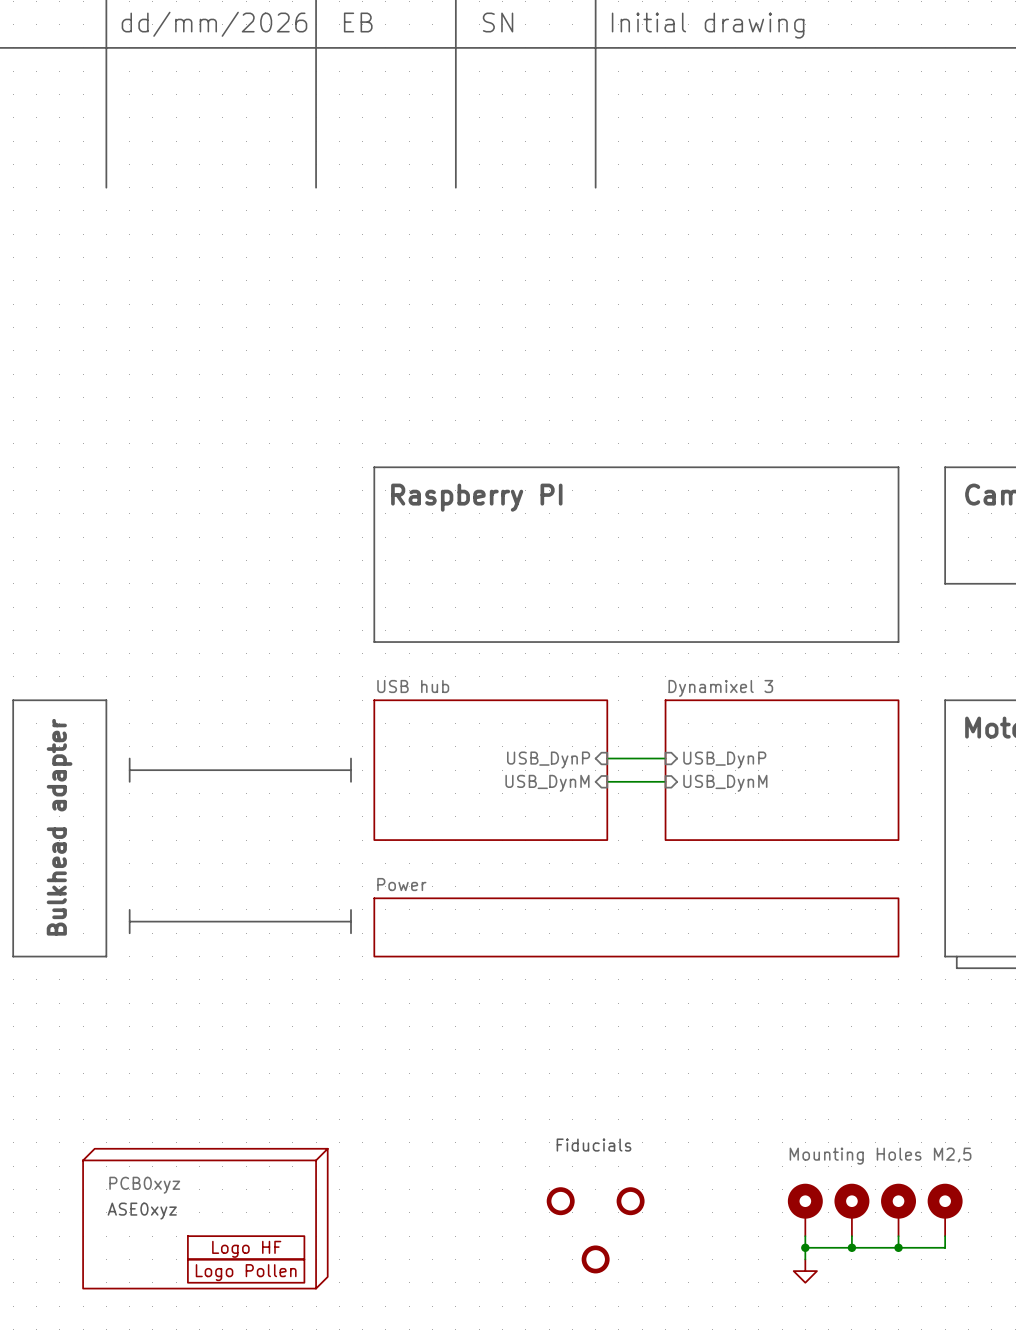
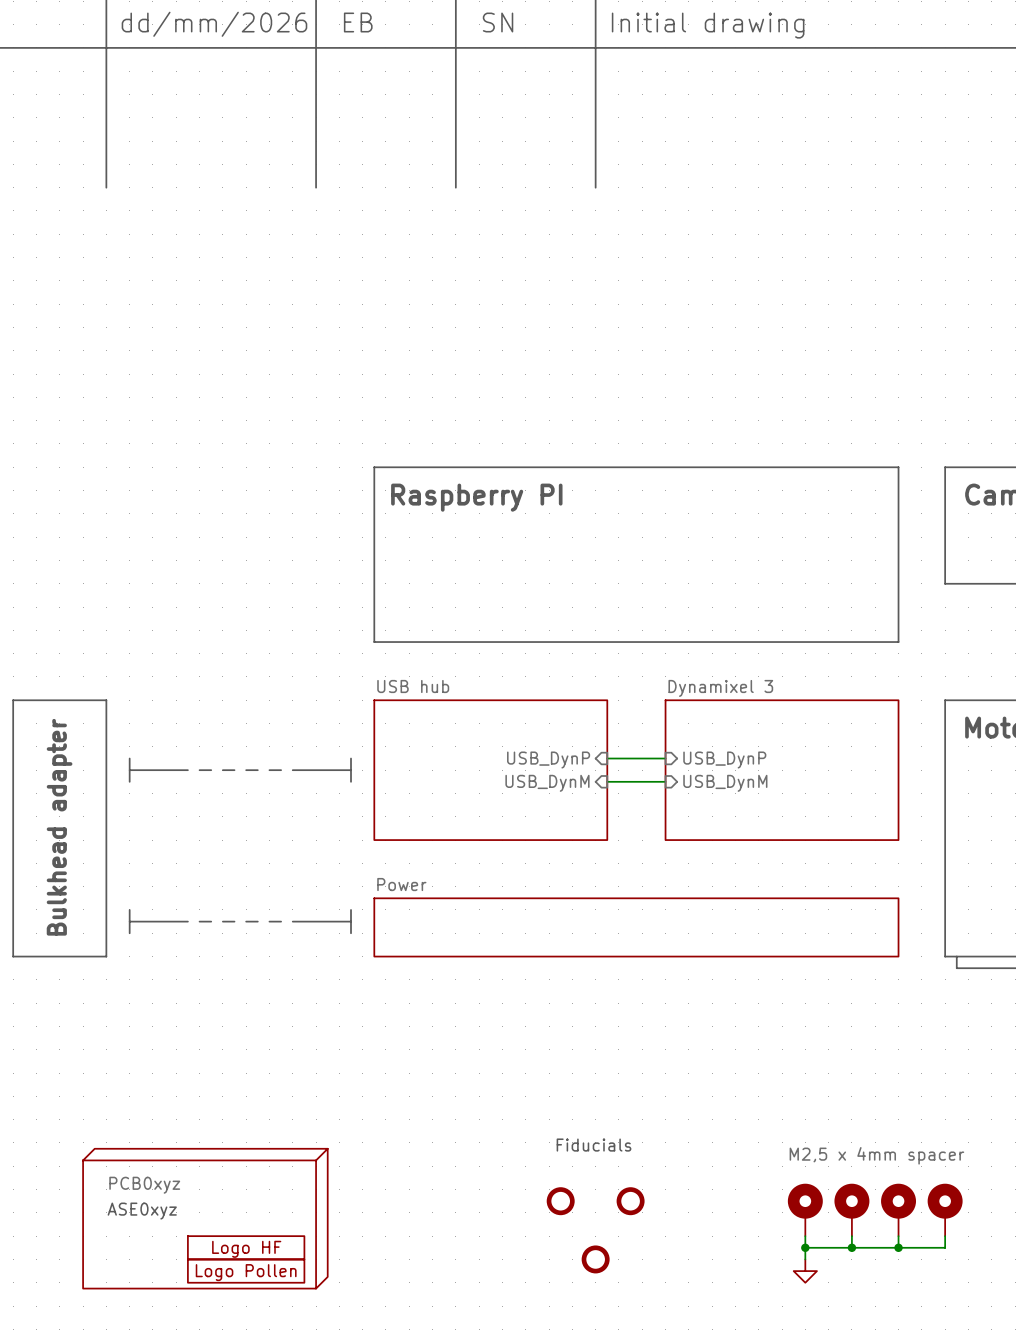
line: (187, 770) (199, 770) -> none
line: (211, 770) (222, 770) -> none
line: (234, 770) (246, 770) -> none
line: (257, 770) (269, 770) -> none
line: (281, 770) (292, 770) -> none
line: (187, 921) (199, 921) -> none
line: (211, 921) (222, 921) -> none
line: (234, 921) (246, 921) -> none
line: (257, 921) (269, 921) -> none
line: (281, 921) (292, 921) -> none
part value: Mounting Holes M2,5 (880, 1156) -> M2,5 x 4mm spacer (876, 1155)

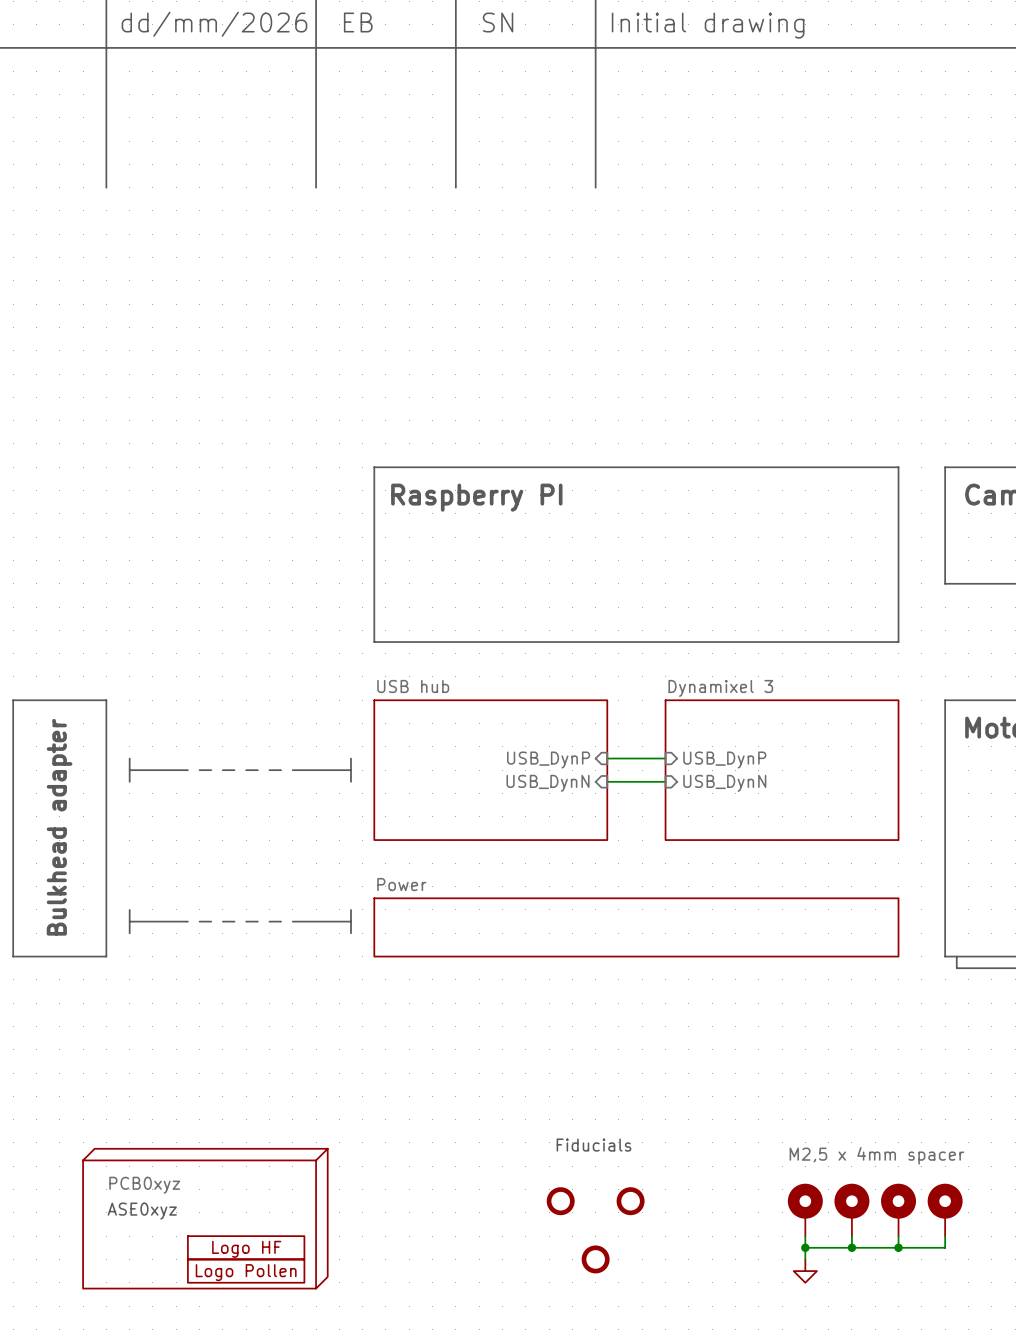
sheet pin: USB_DynM (547, 783) -> USB_DynN (548, 783)
sheet pin: USB_DynM (725, 783) -> USB_DynN (724, 783)

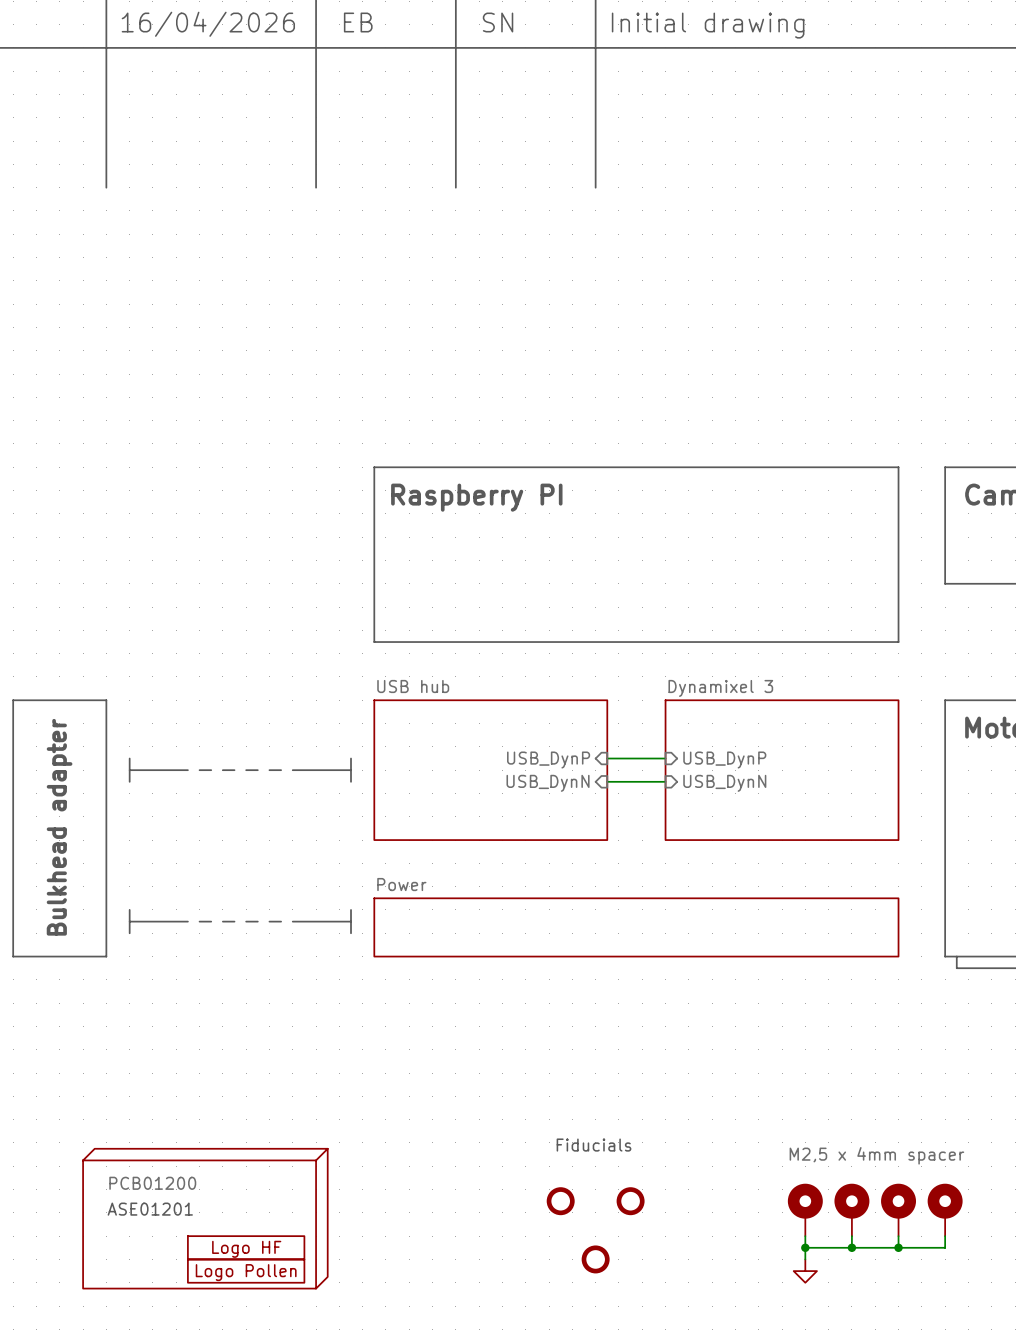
text: dd/mm/2026 (214, 24) -> 16/04/2026 (208, 24)
part value: PCB0xyz (144, 1185) -> PCB01200 (152, 1183)
text: ASE0xyz (142, 1211) -> ASE01201 (150, 1209)

